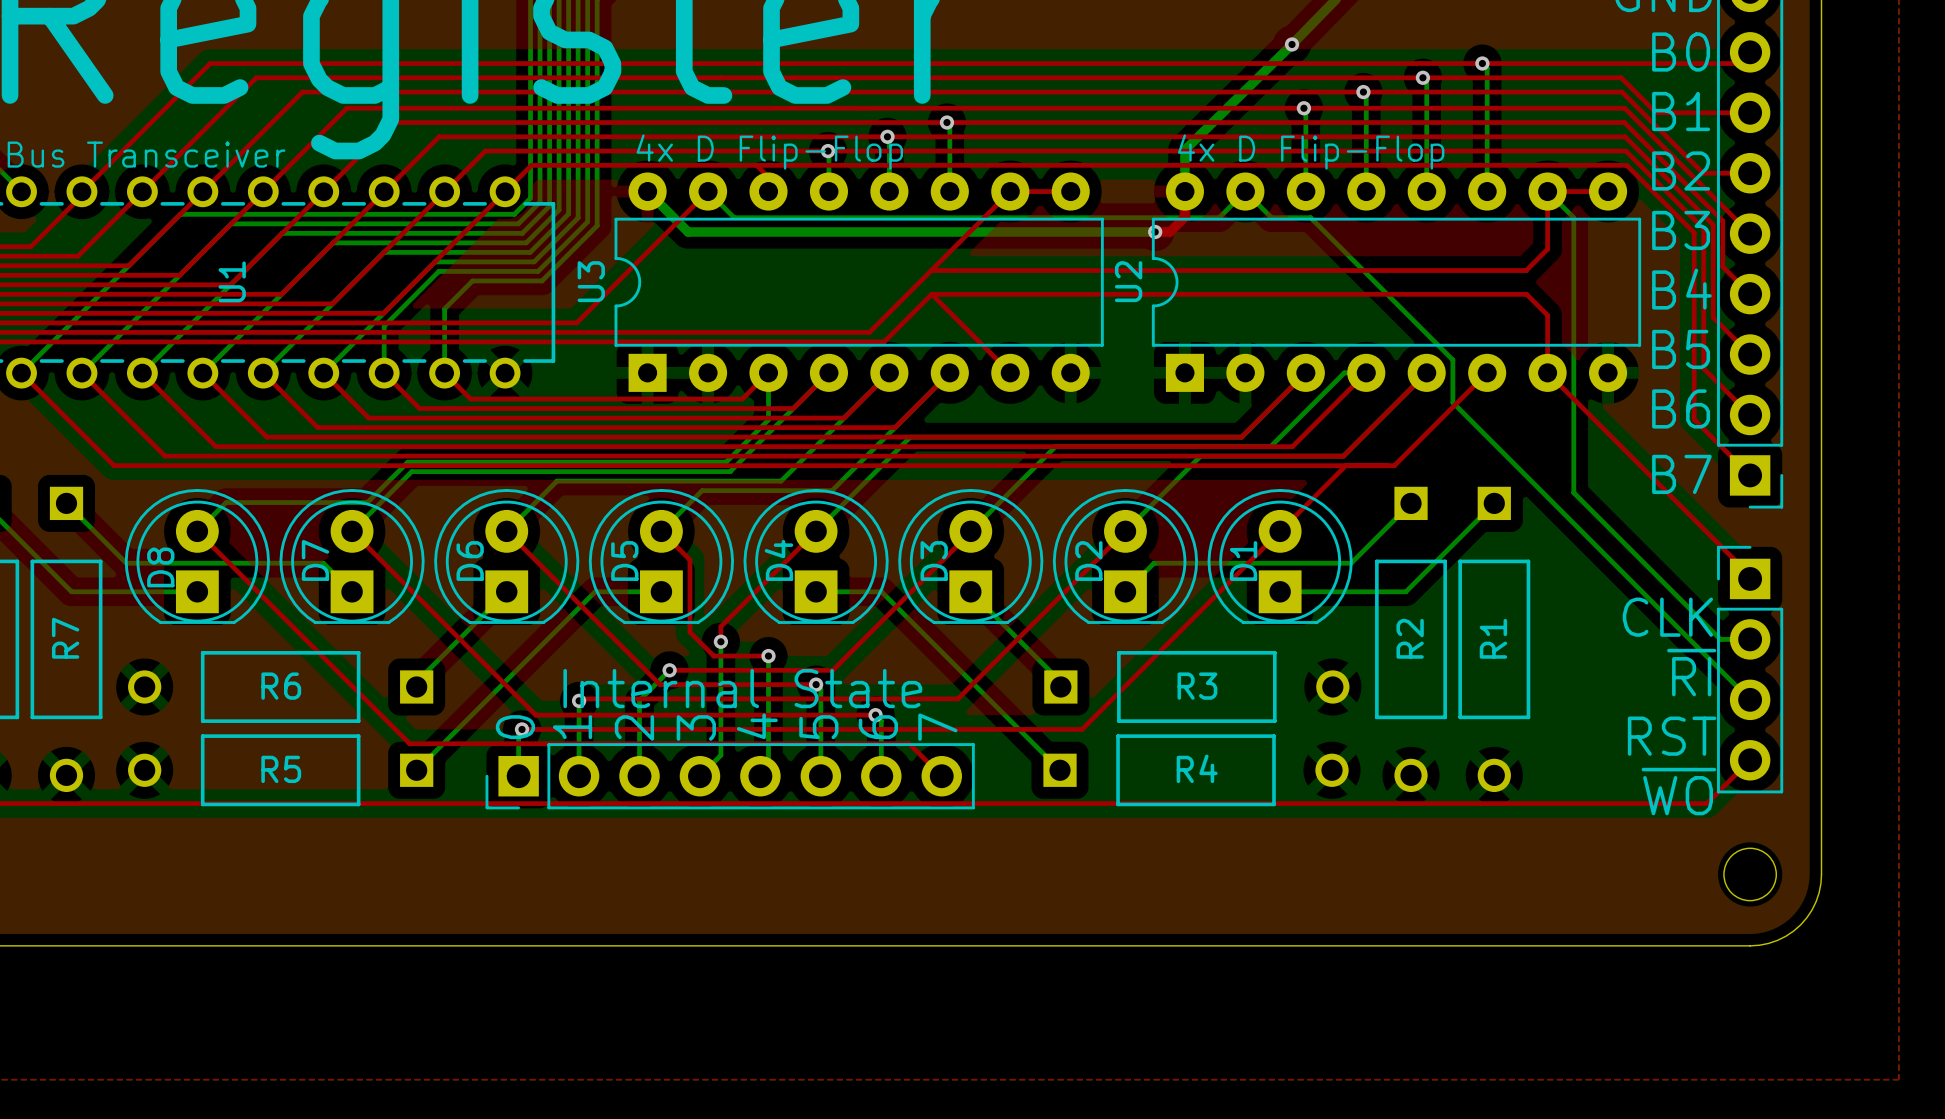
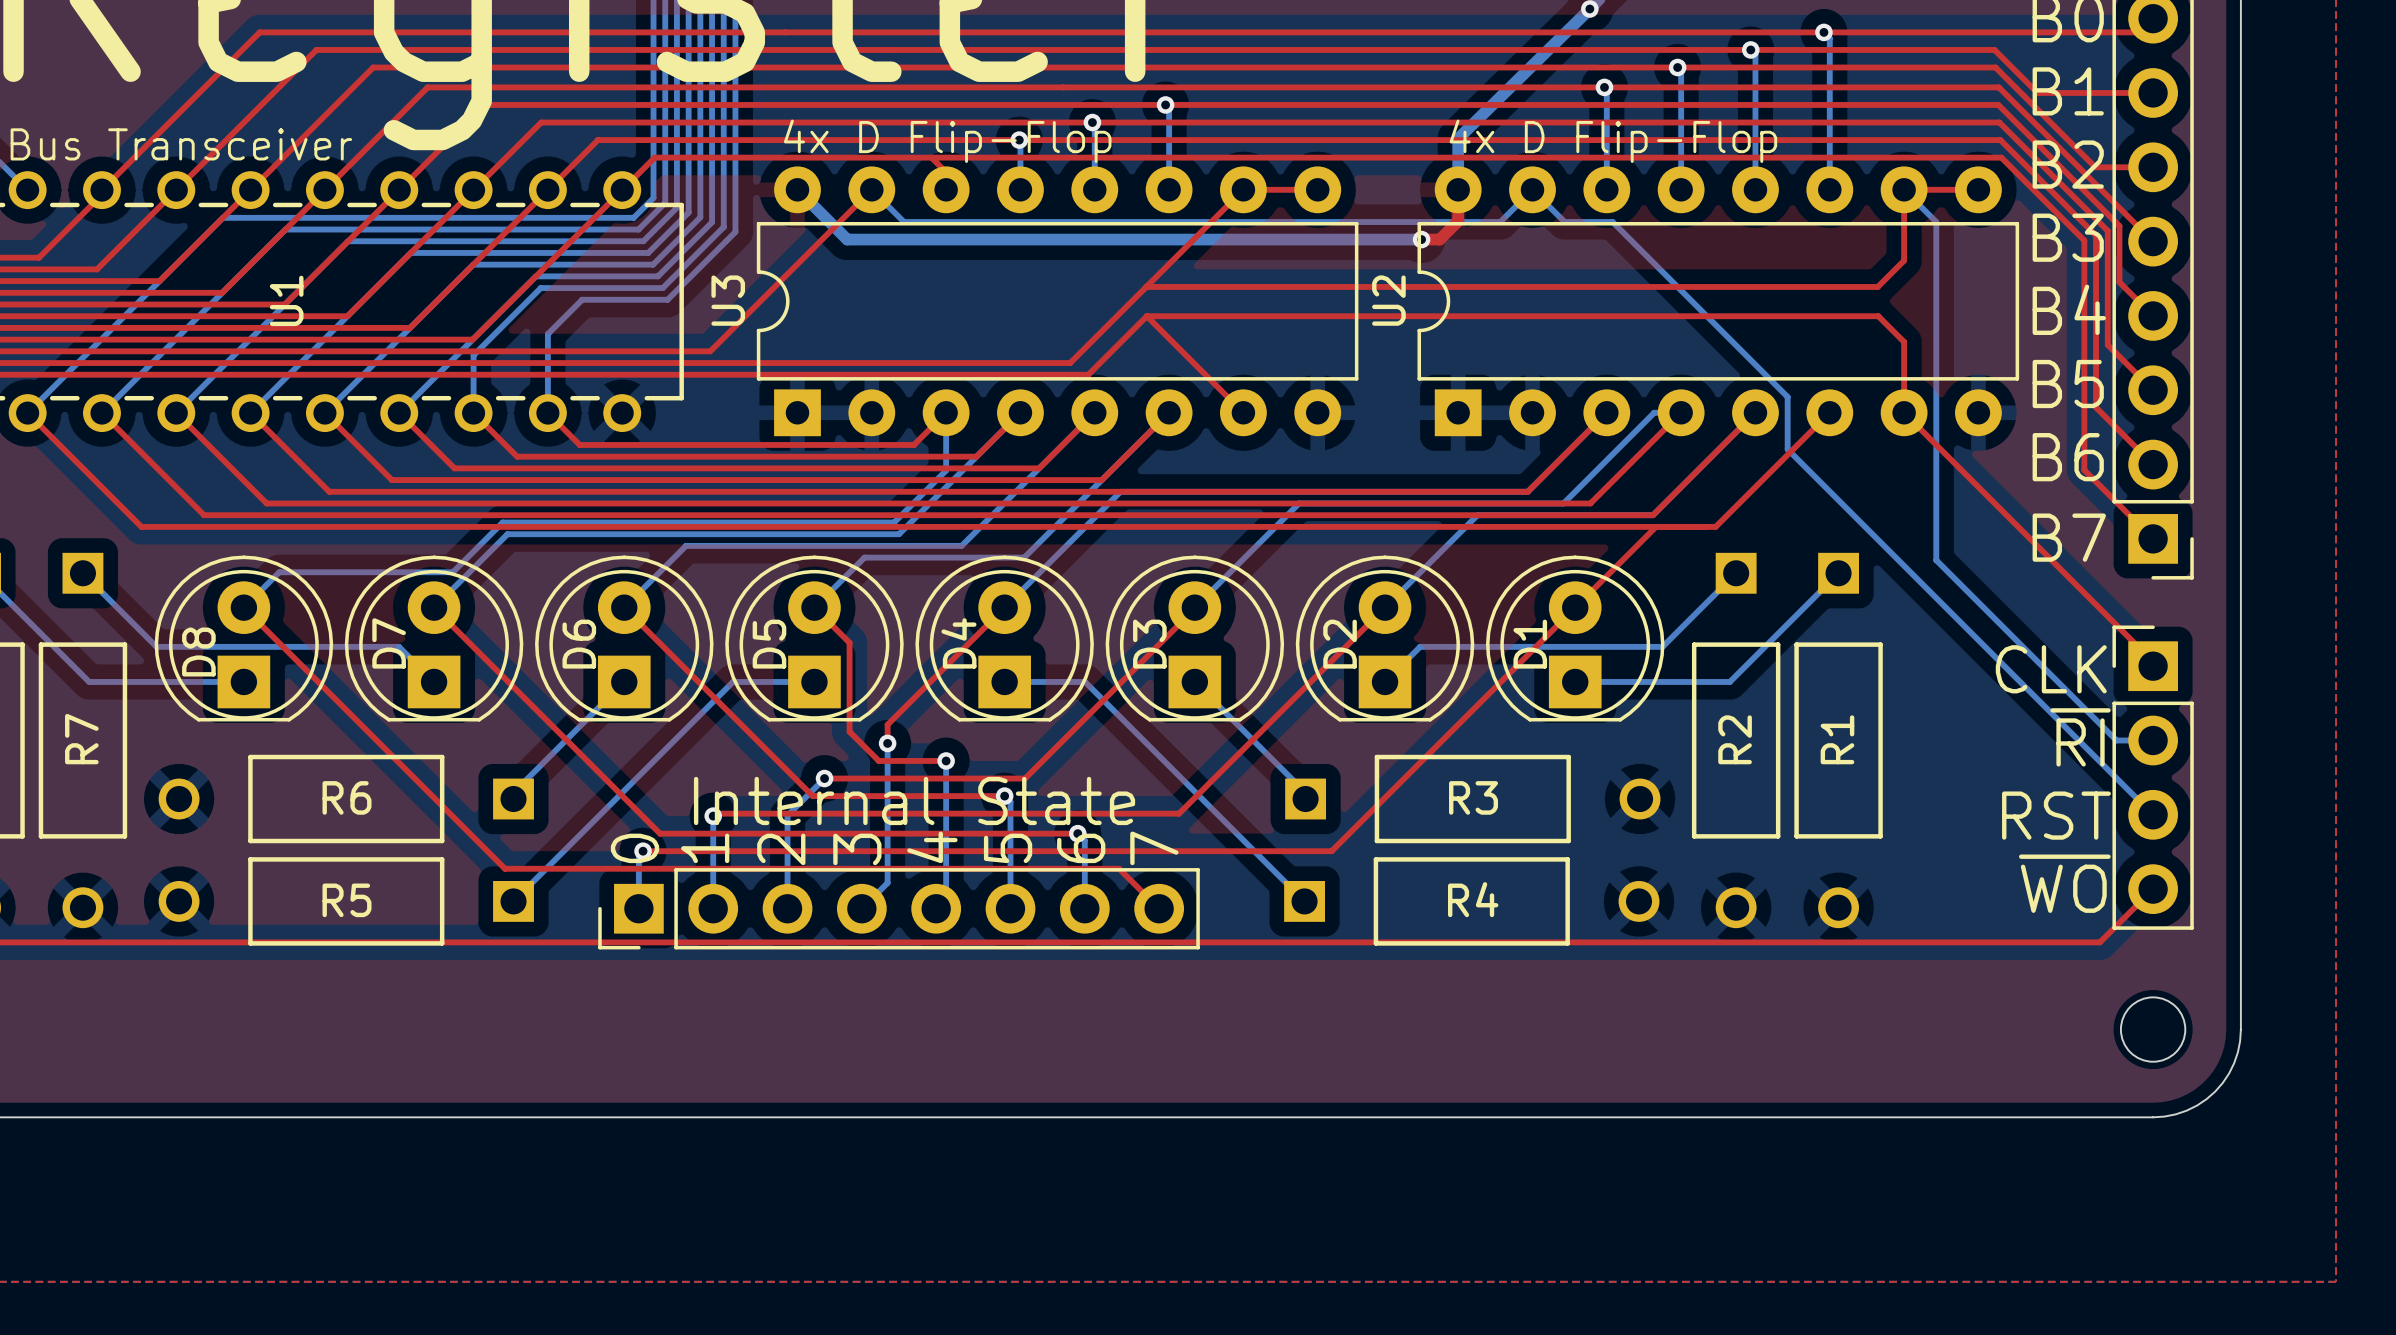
text position: CLK (1667, 617) -> CLK (2051, 669)
text position: ~{RI} (1691, 672) -> ~{RI} (2080, 737)
text position: RST (1672, 736) -> RST (2056, 815)
text position: ~{WO} (1678, 791) -> ~{WO} (2064, 883)

